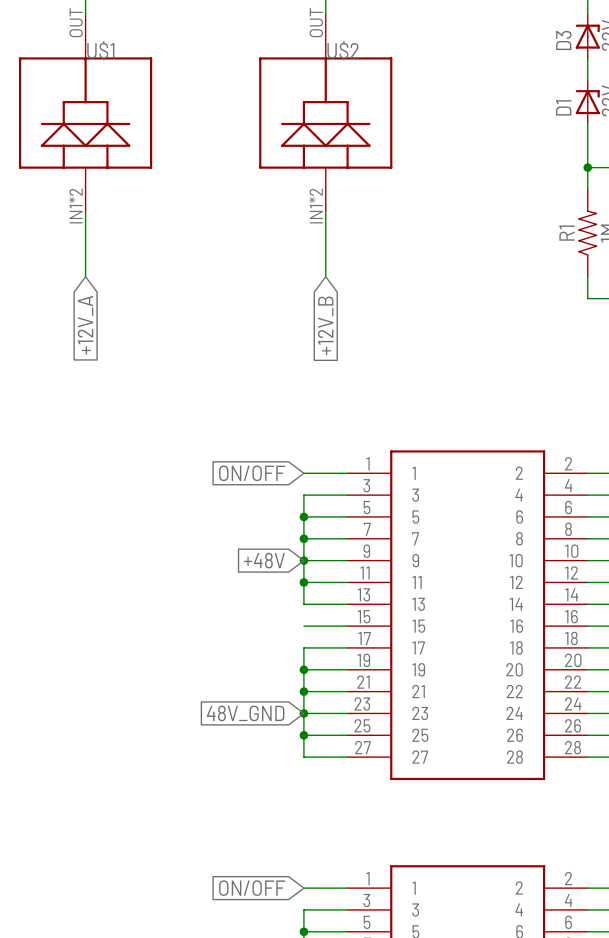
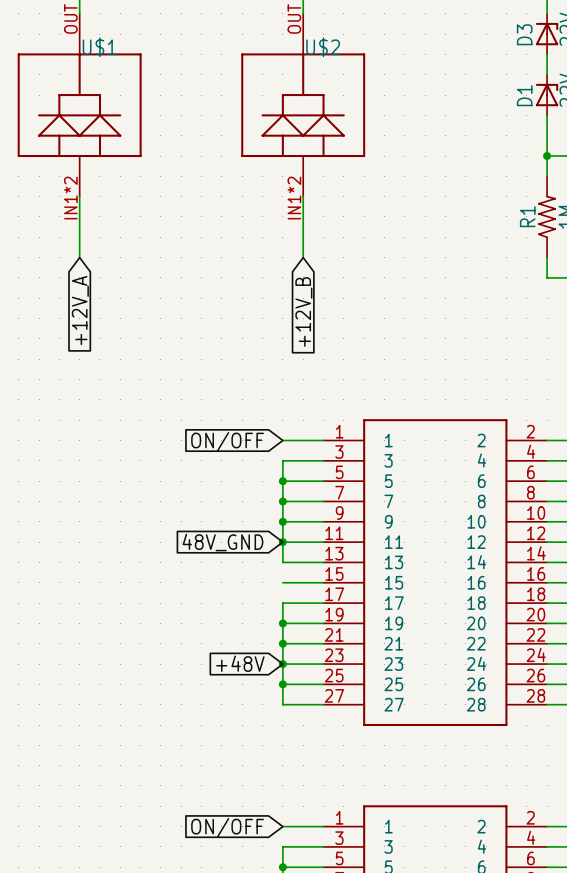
global label: +48V (264, 560) -> none
global label: none -> 48V_GND (222, 542)
global label: 48V_GND (245, 713) -> +48V (240, 663)

